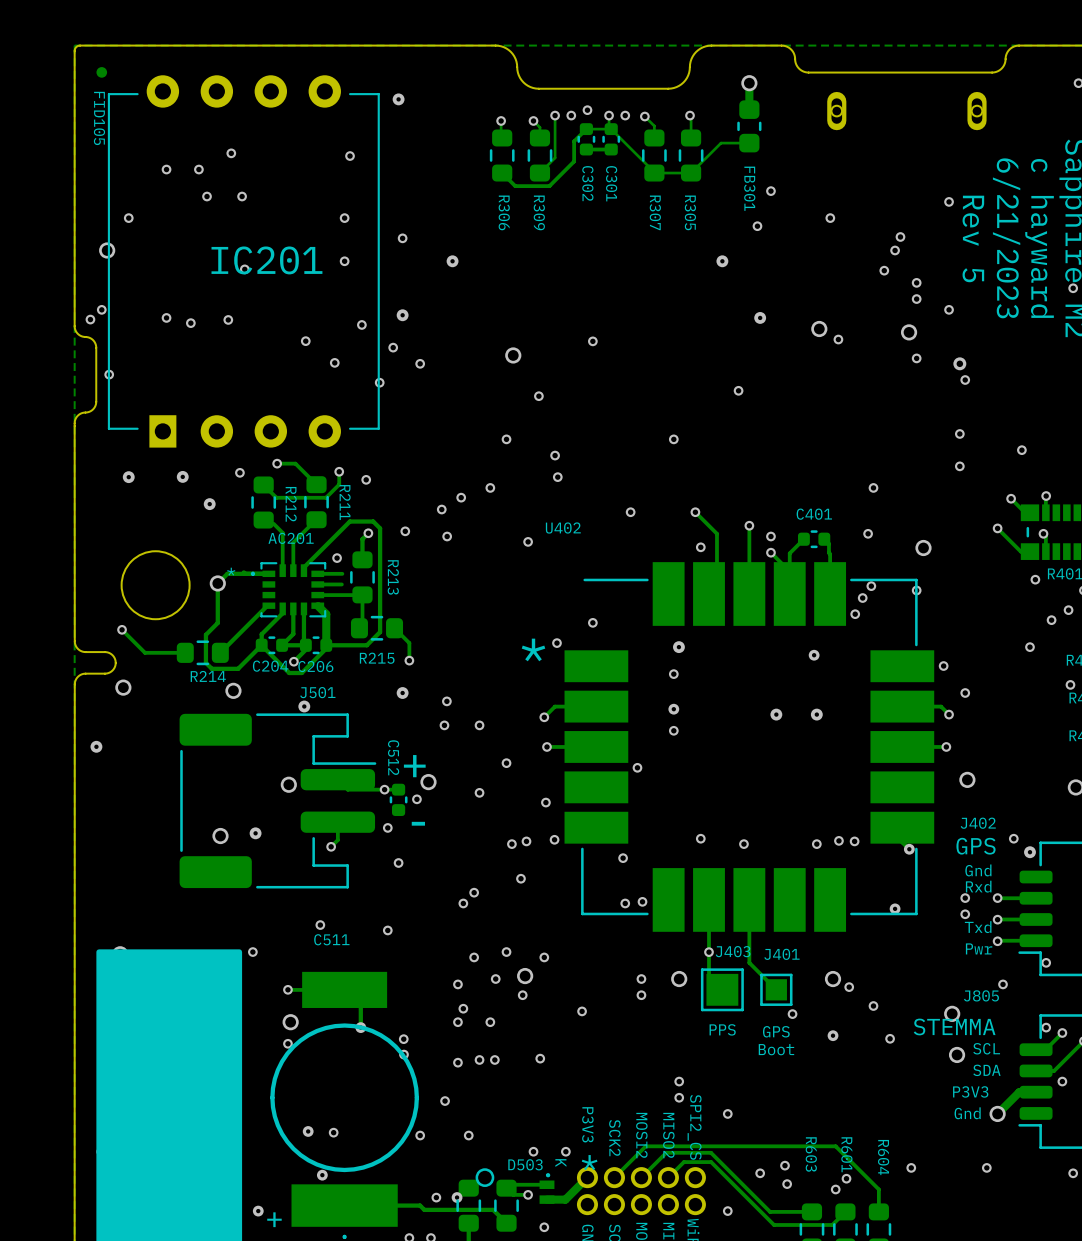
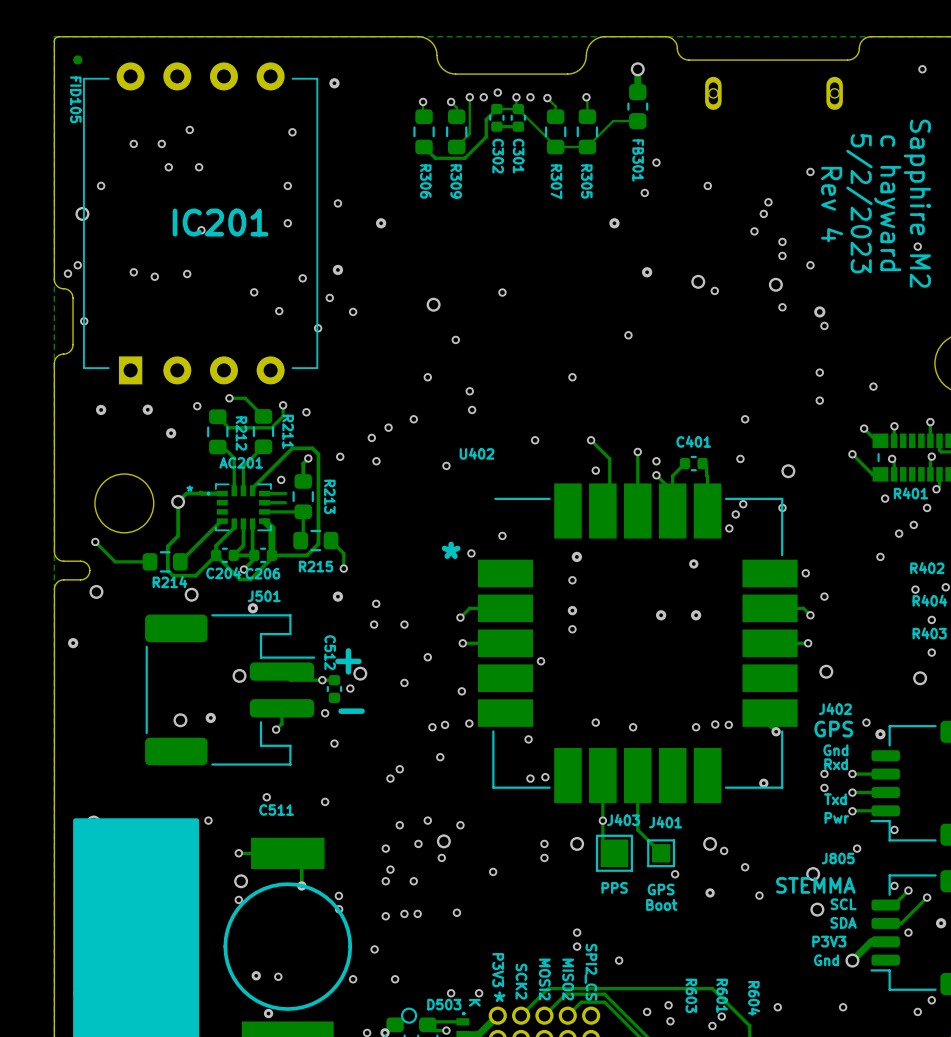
text: Rev 5 (973, 238) -> Rev 4 (832, 204)
text: 6/21/2023 (1006, 238) -> 5/2/2023 (859, 203)

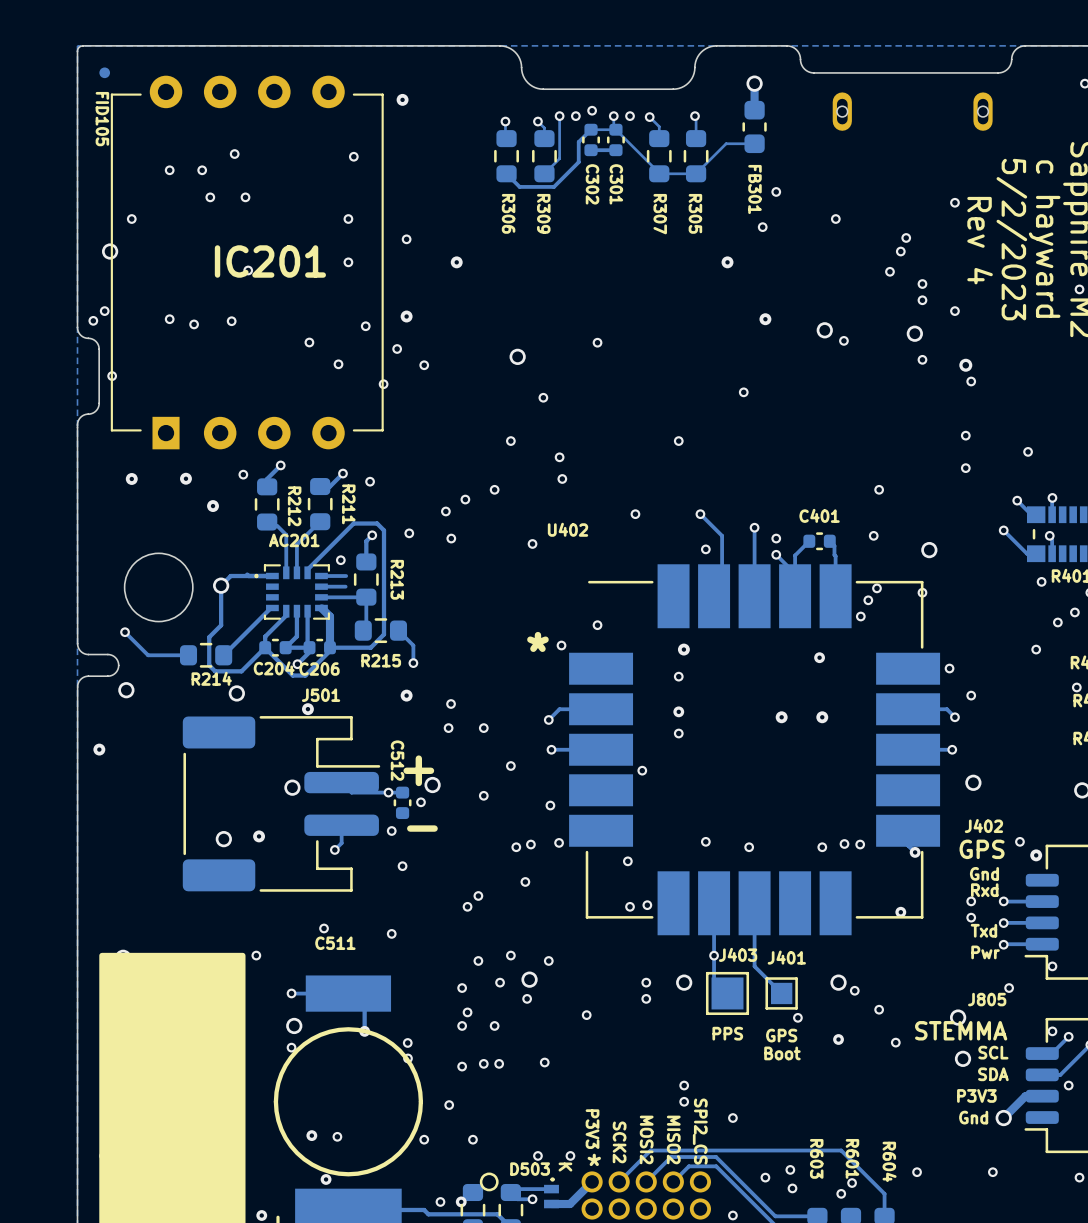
track: (229, 398) (245, 398) (263, 416) -> (280, 465) (267, 478) (267, 486)
track: (283, 405) (283, 416) (271, 427) (228, 427) (217, 416) -> (342, 473) (330, 486) (320, 486)
text: * (189, 488) -> none

